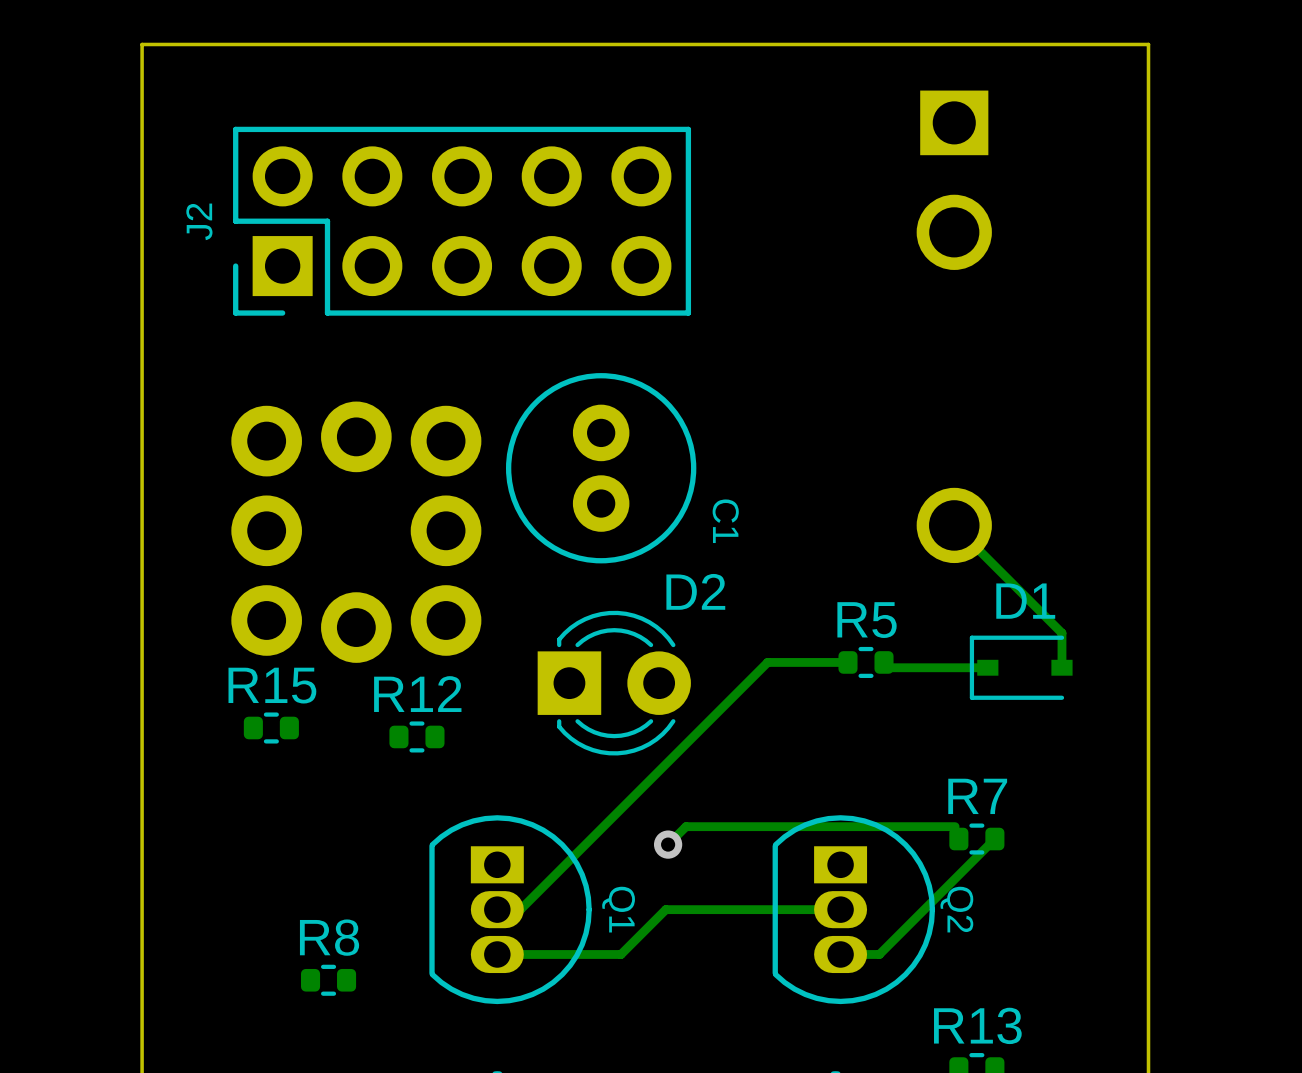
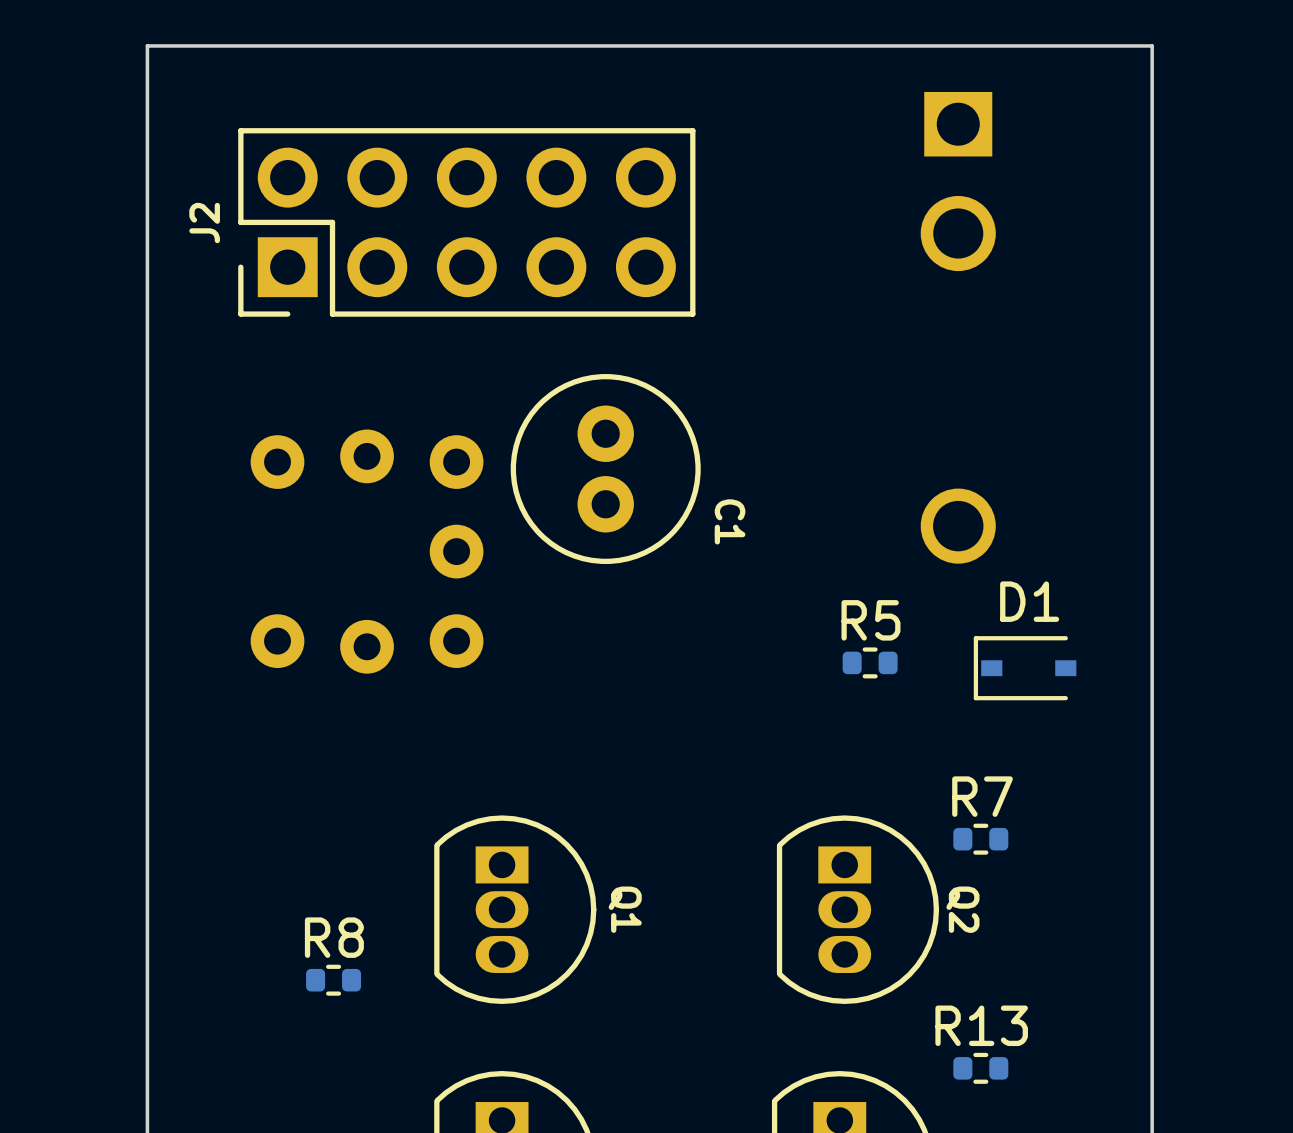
part footprint: [231, 401, 482, 663] -> [250, 429, 484, 674]
track: (954, 525) (1061, 633) (1061, 667) -> none
track: (847, 662) (767, 662) (520, 909) (497, 909) -> none
track: (884, 662) (889, 667) (987, 667) -> none
D2: (614, 683) -> none
R15: (271, 727) -> none
R12: (416, 736) -> none
track: (955, 826) (686, 826) (668, 844) -> none
track: (994, 839) (879, 954) (840, 954) -> none
via: (668, 844) -> none
track: (840, 909) (665, 909) (621, 954) (497, 954) -> none

